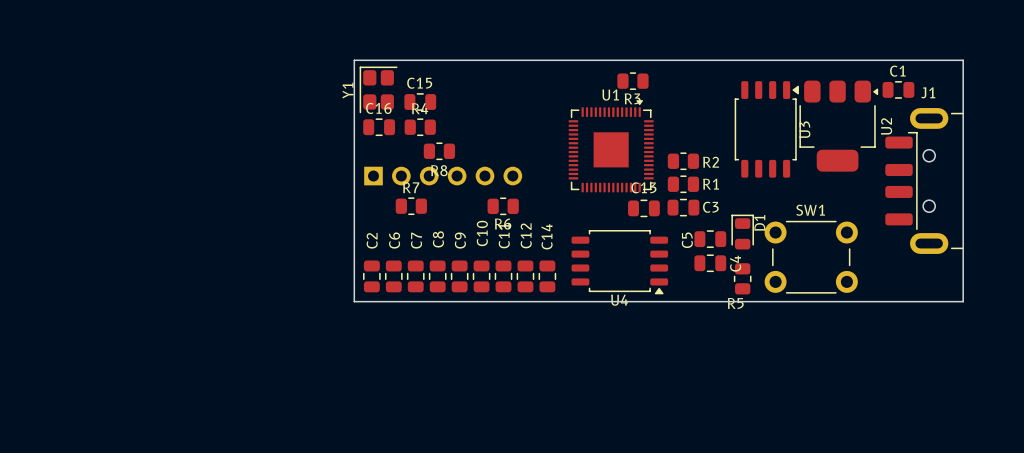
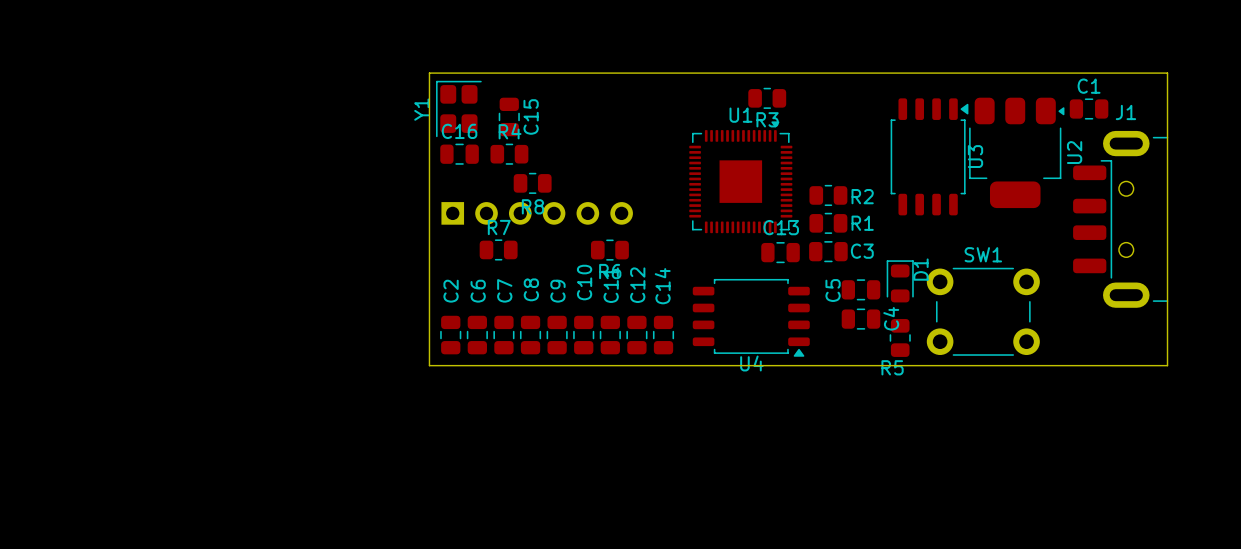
C15 rotation: 0° (420, 101) -> 90° clockwise (509, 116)

